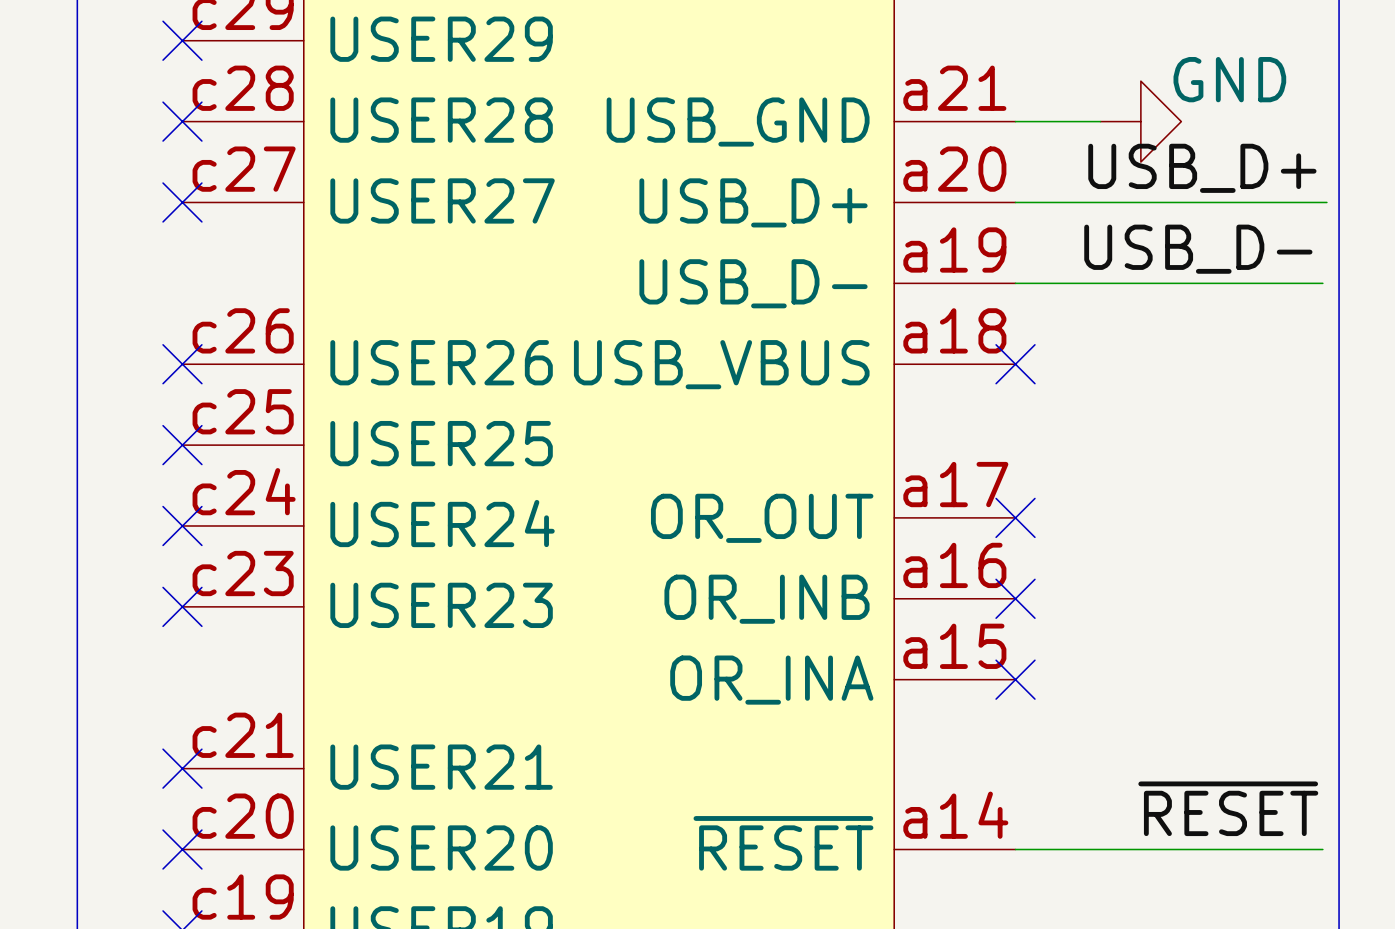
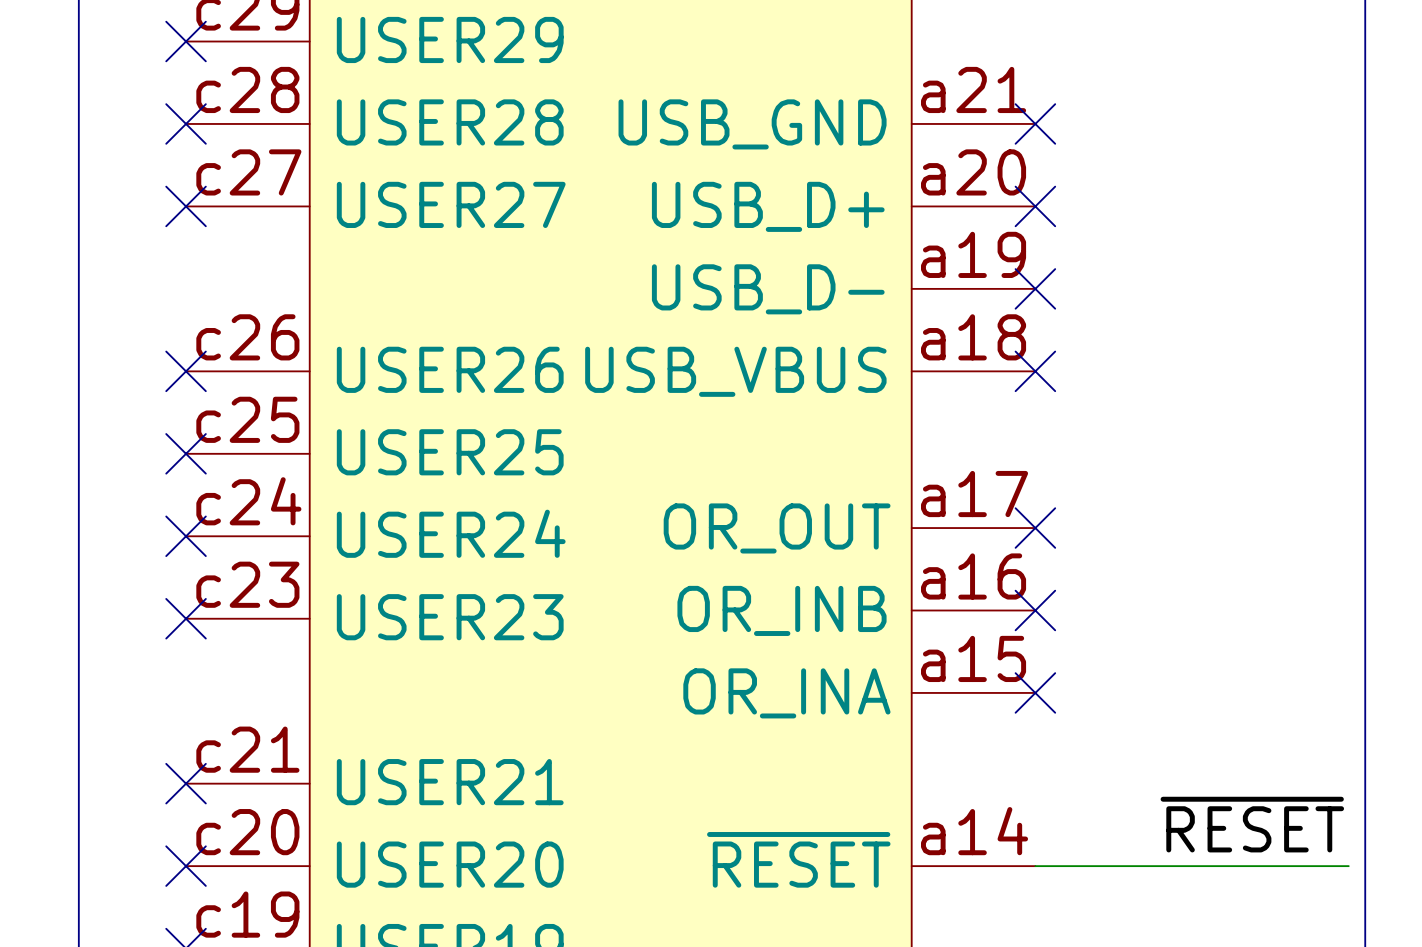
wire: (1015, 121) (1100, 121) -> none
no-connect mark: none -> (1035, 123)
power symbol: GND (1140, 121) -> none
label: USB_D+ (1202, 168) -> none
wire: (1015, 202) (1326, 202) -> none
no-connect mark: none -> (1035, 206)
label: USB_D- (1198, 249) -> none
wire: (1015, 283) (1322, 283) -> none
no-connect mark: none -> (1035, 288)

